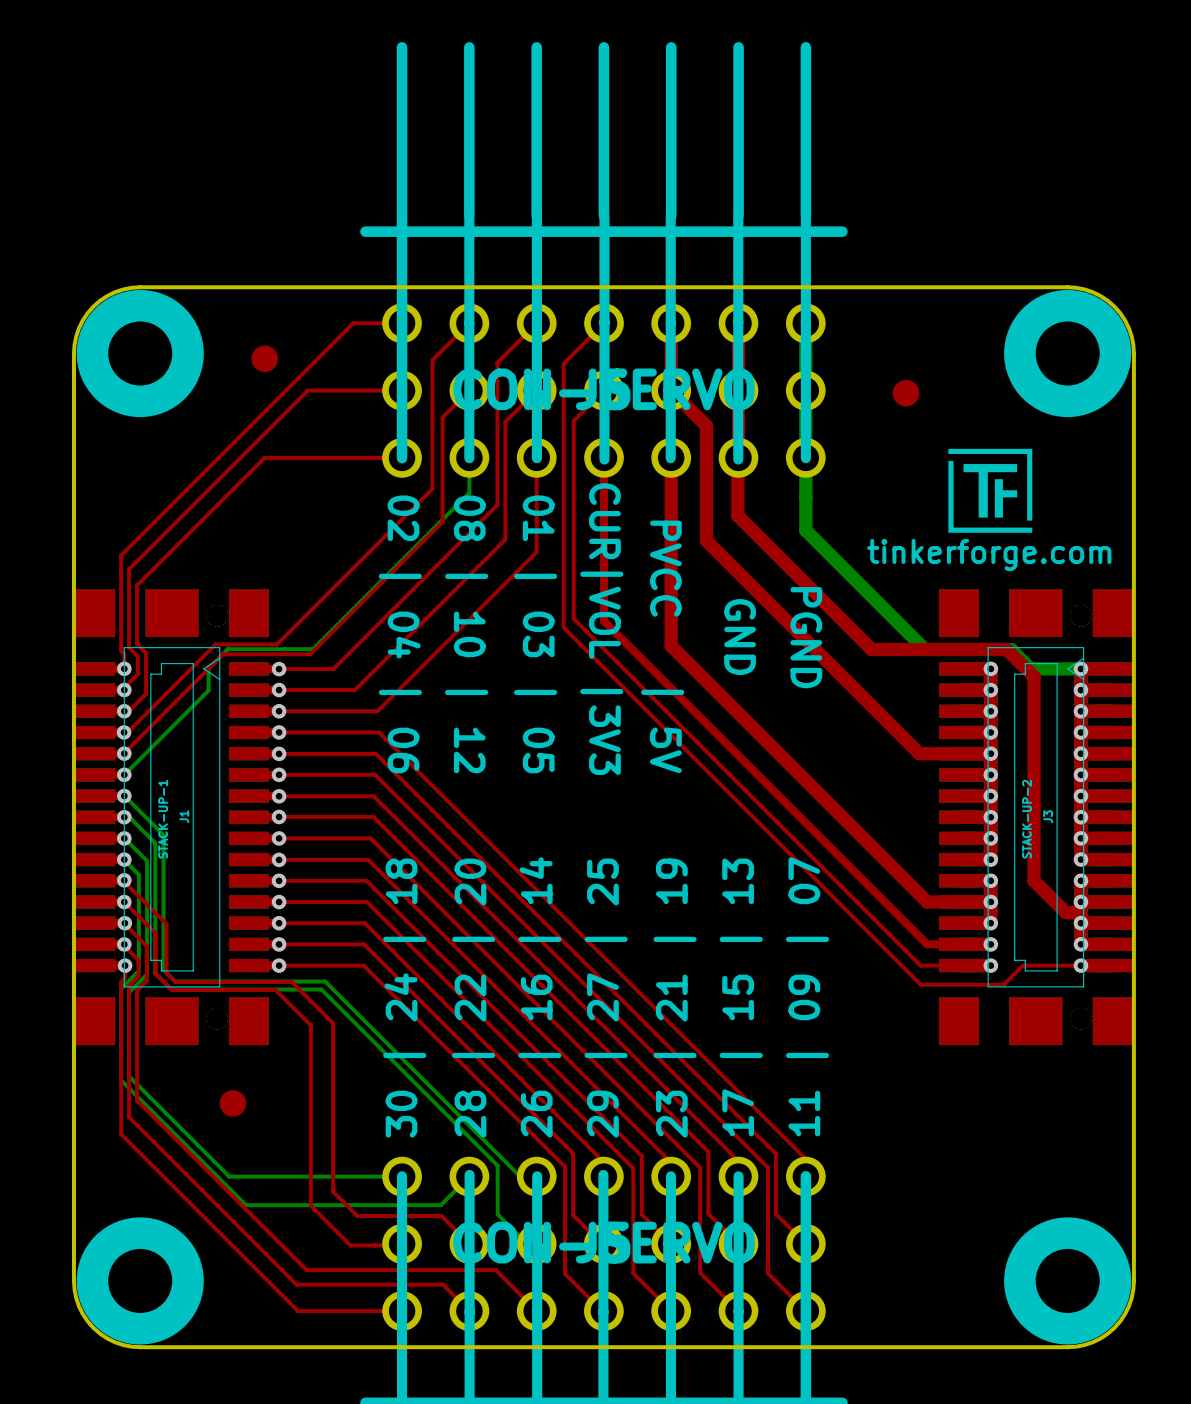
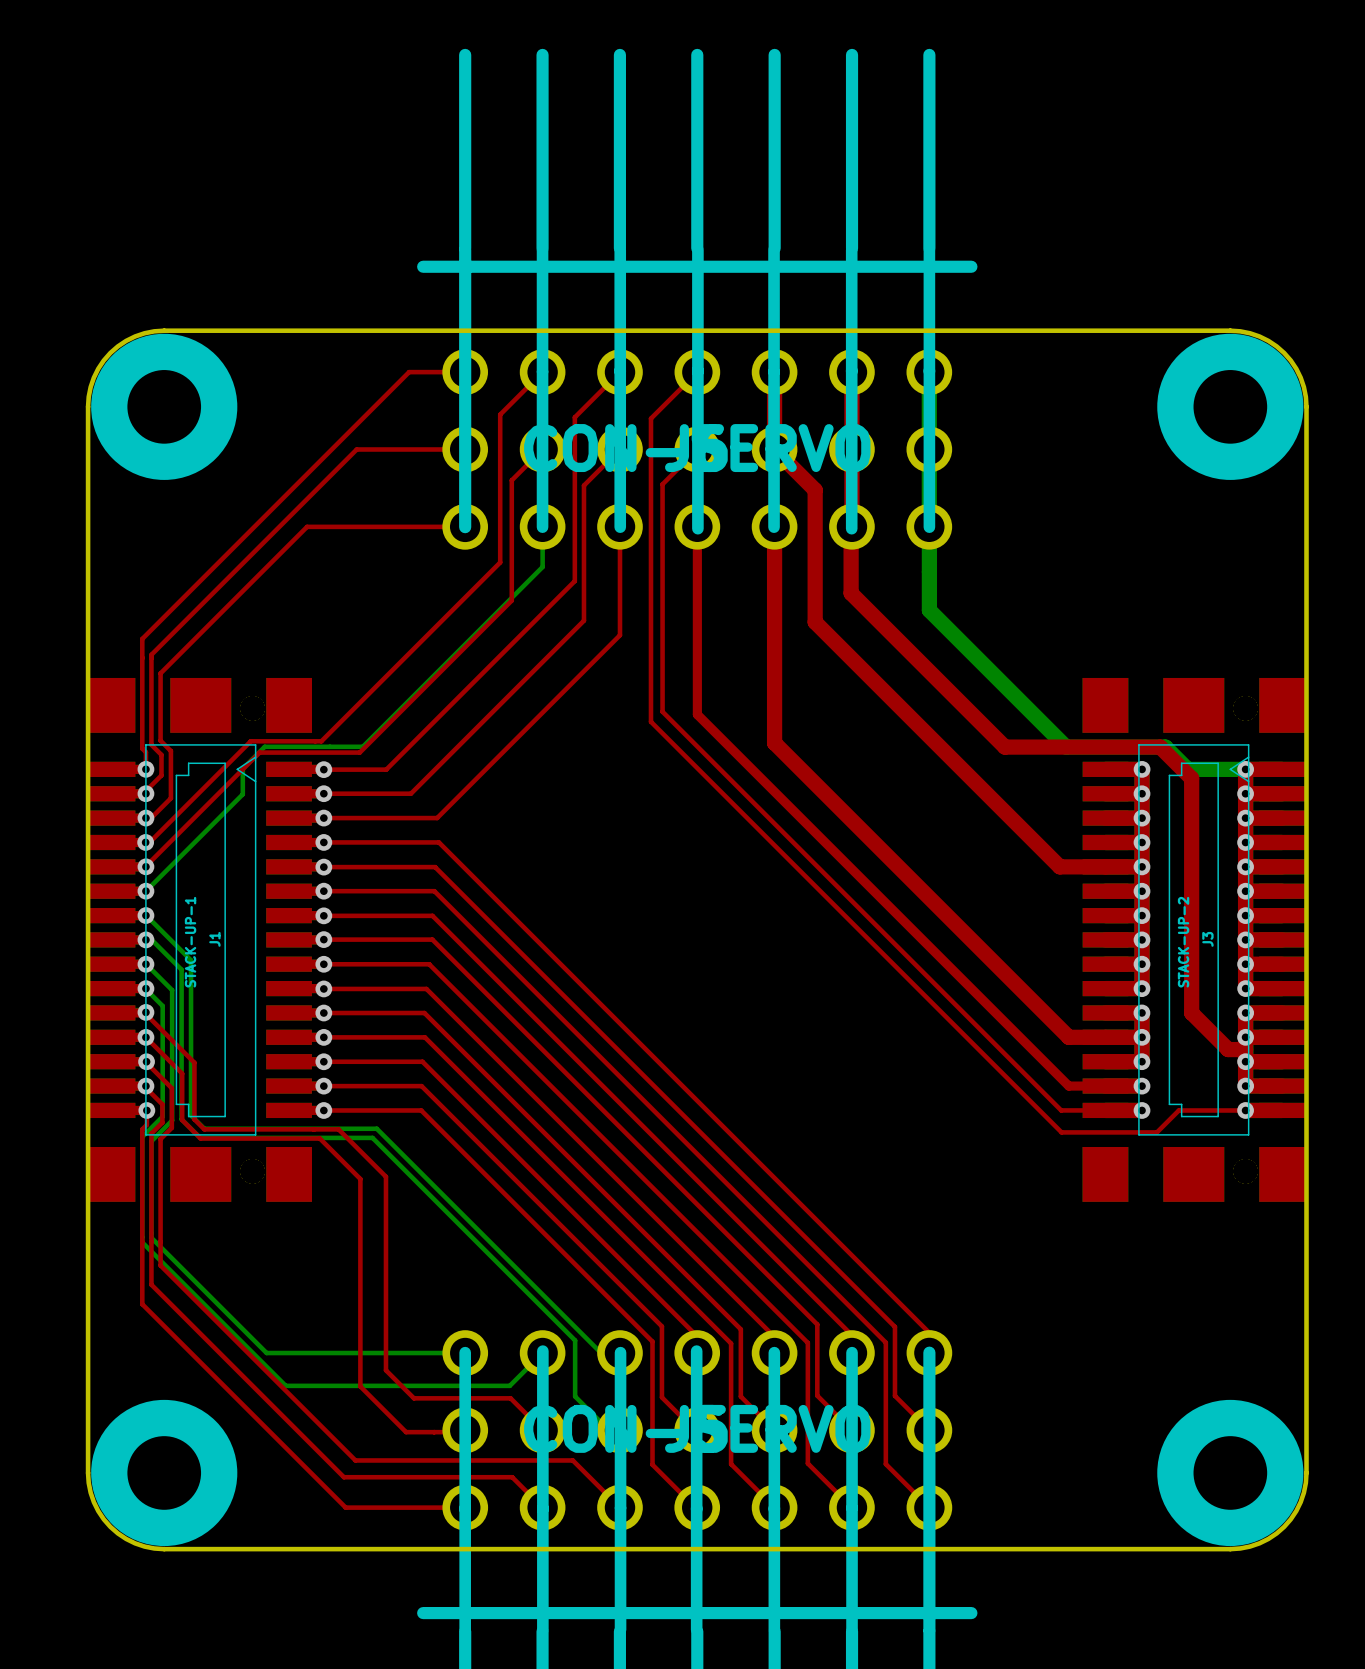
part: (264, 358) -> none
part: (906, 393) -> none
drawing: [948, 448, 1033, 533] -> none
text: tinkerforge.com (989, 554) -> none
text: CUR|VOL |3V3 (601, 629) -> none
text: 02 | 04 | 06 (400, 634) -> none
text: 08 | 10 | 12 (466, 634) -> none
text: 01 | 03 | 05 (535, 634) -> none
text: GND (740, 637) -> none
text: PGND (806, 637) -> none
text: PVCC | 5V (662, 646) -> none
text: 11 | 09 | 07 (807, 996) -> none
text: 26 | 16 | 14 (539, 997) -> none
text: 17 | 15 | 13 (741, 997) -> none
text: 30 | 24 | 18 (404, 998) -> none
text: 28 | 22 | 20 (473, 998) -> none
text: 29 | 27 | 25 (606, 998) -> none
text: 23 | 21 | 19 (675, 998) -> none
part: (232, 1103) -> none

